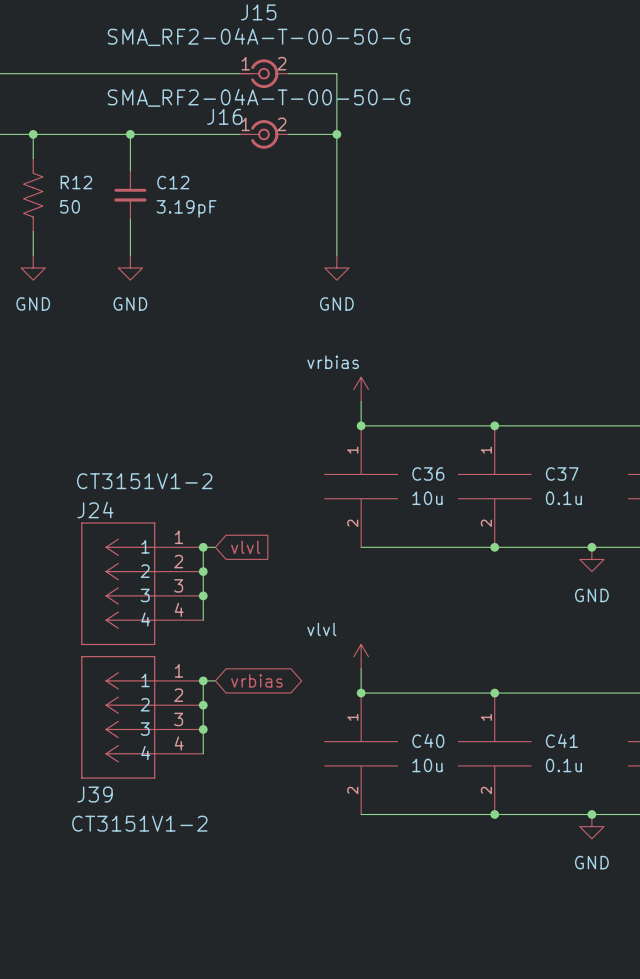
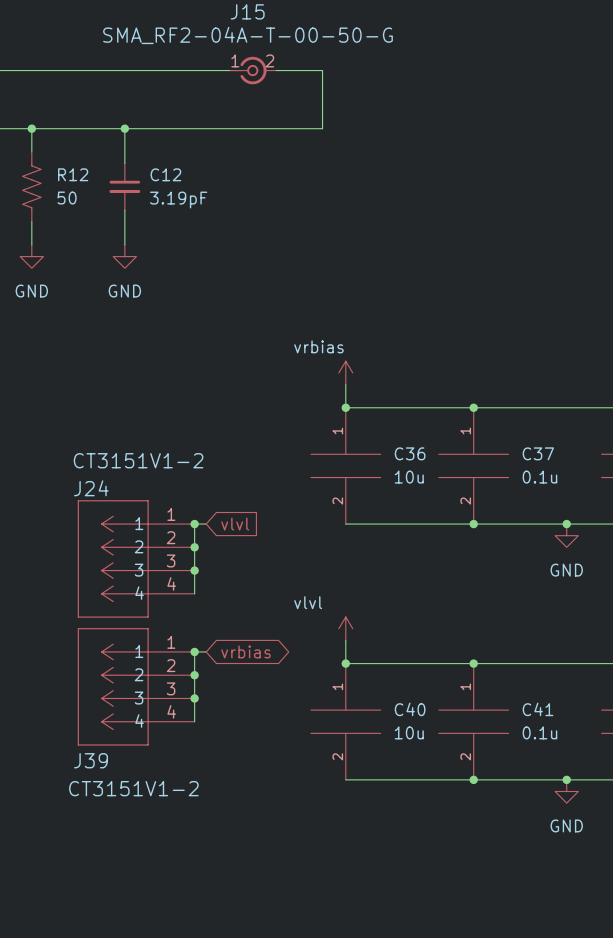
J16: SMA_RF2-04A-T-00-50-G (263, 134) -> none
wire: (336, 134) (336, 255) -> none
junction: (336, 134) -> none
power symbol: GND (336, 267) -> none

